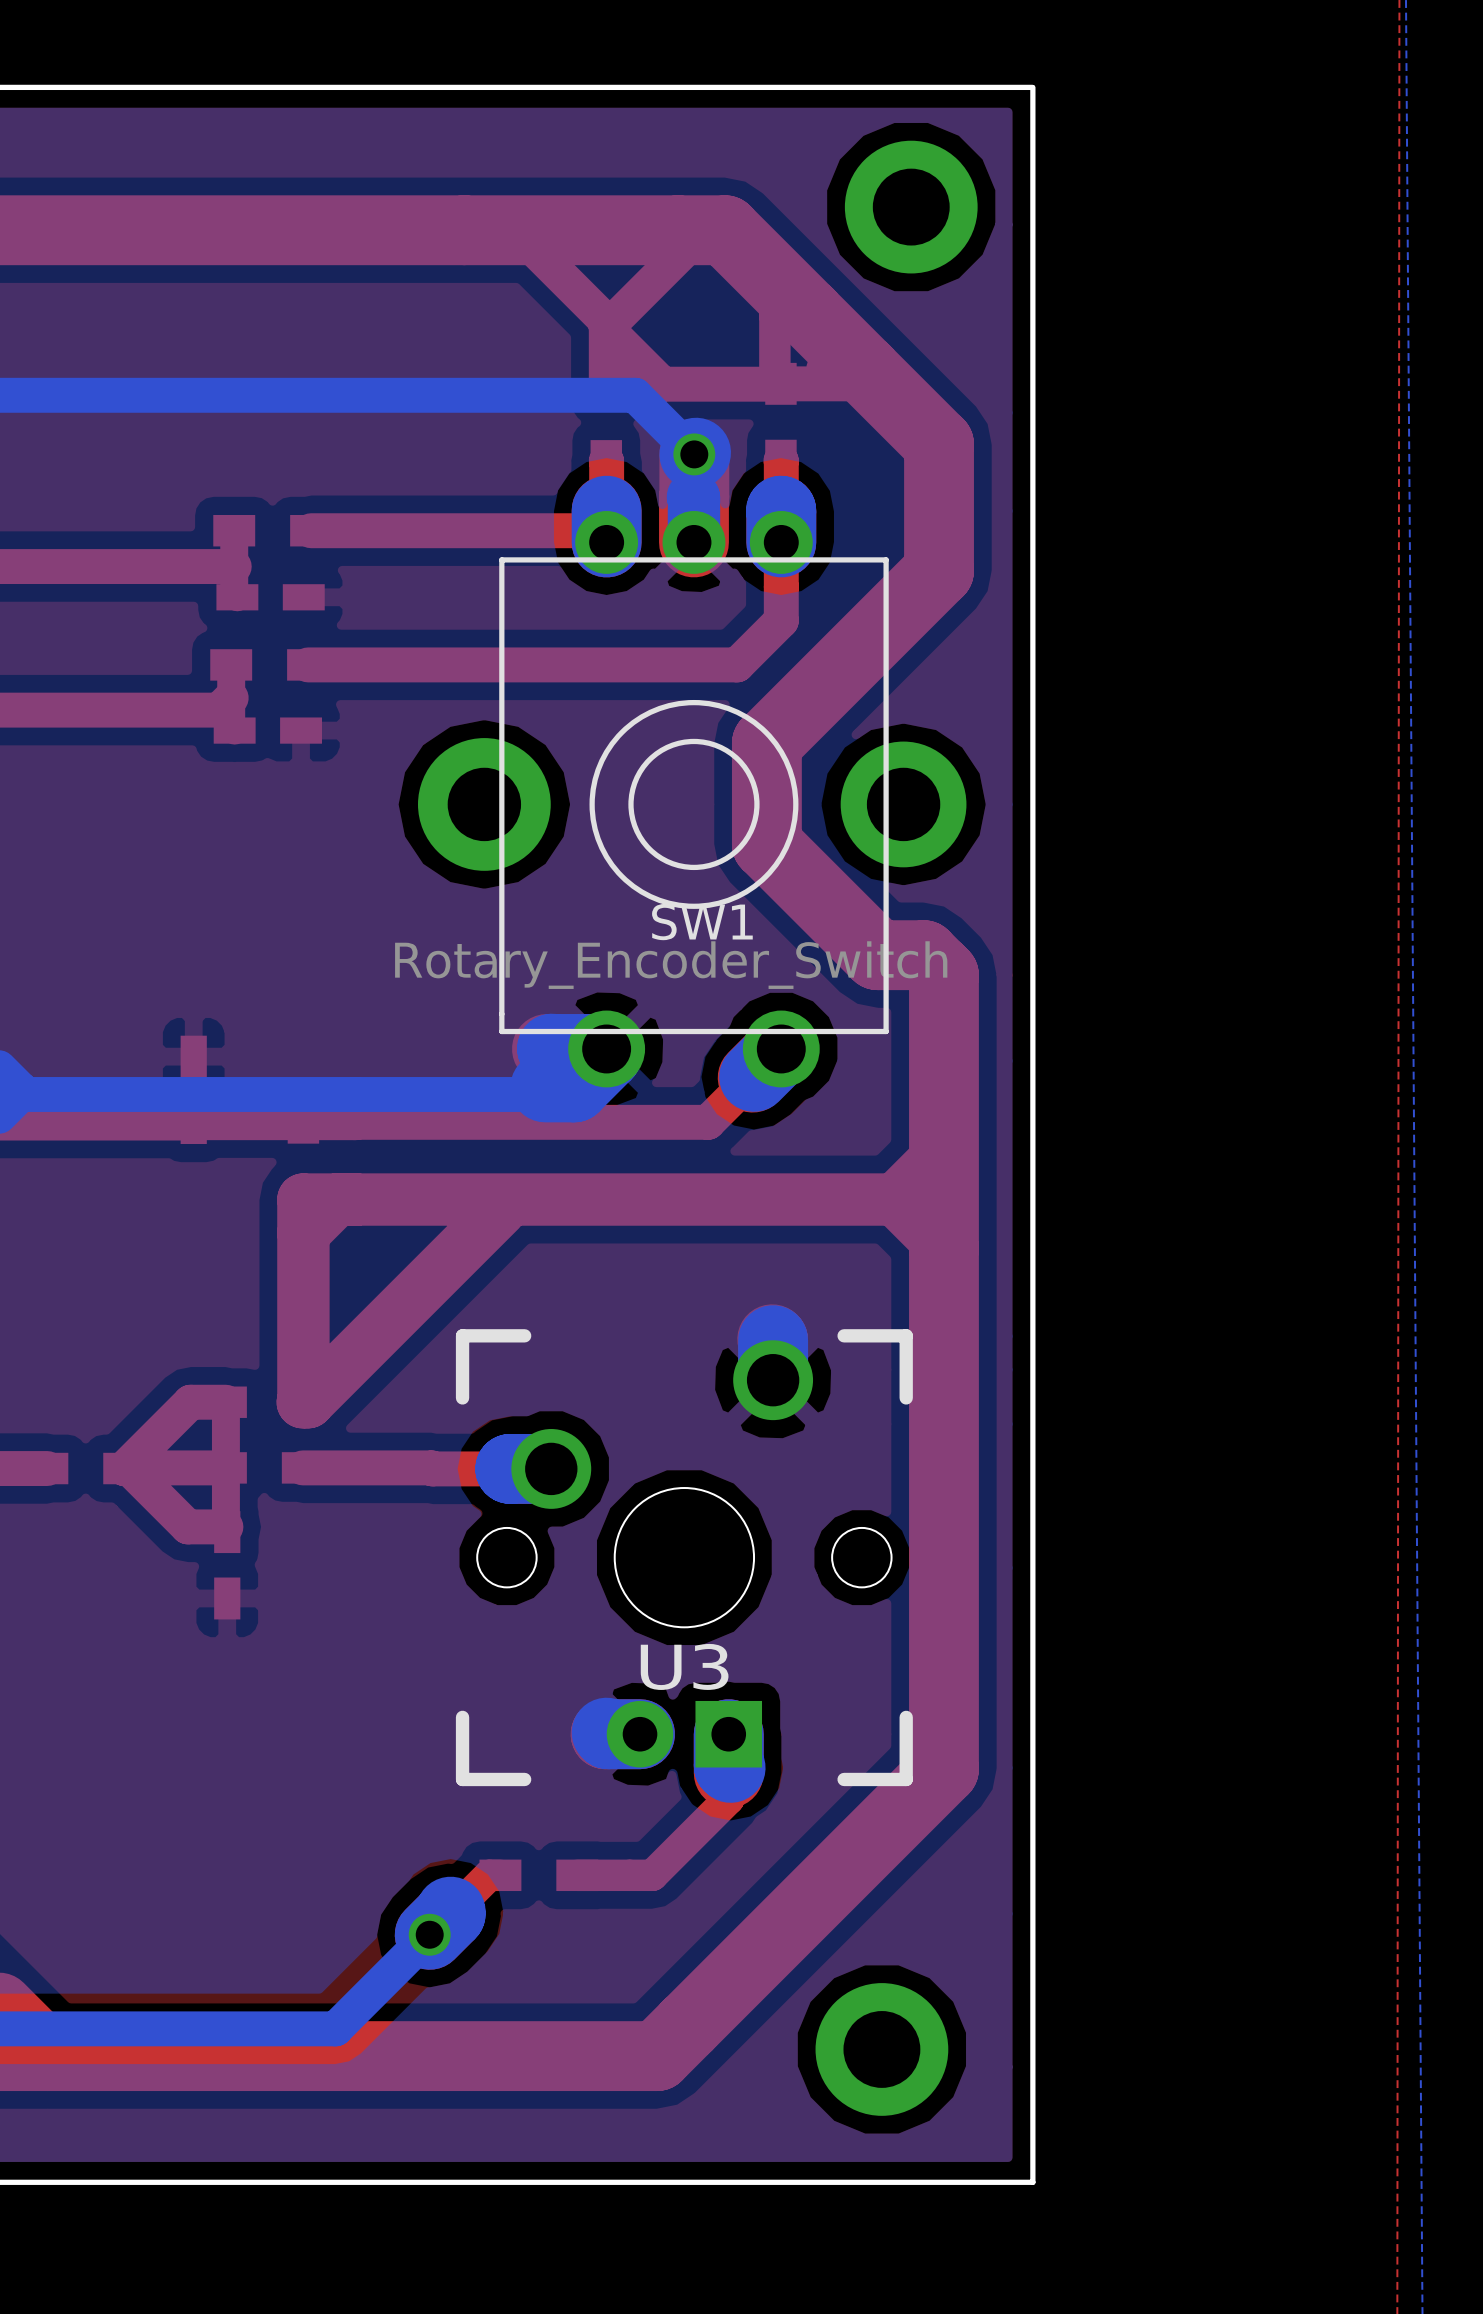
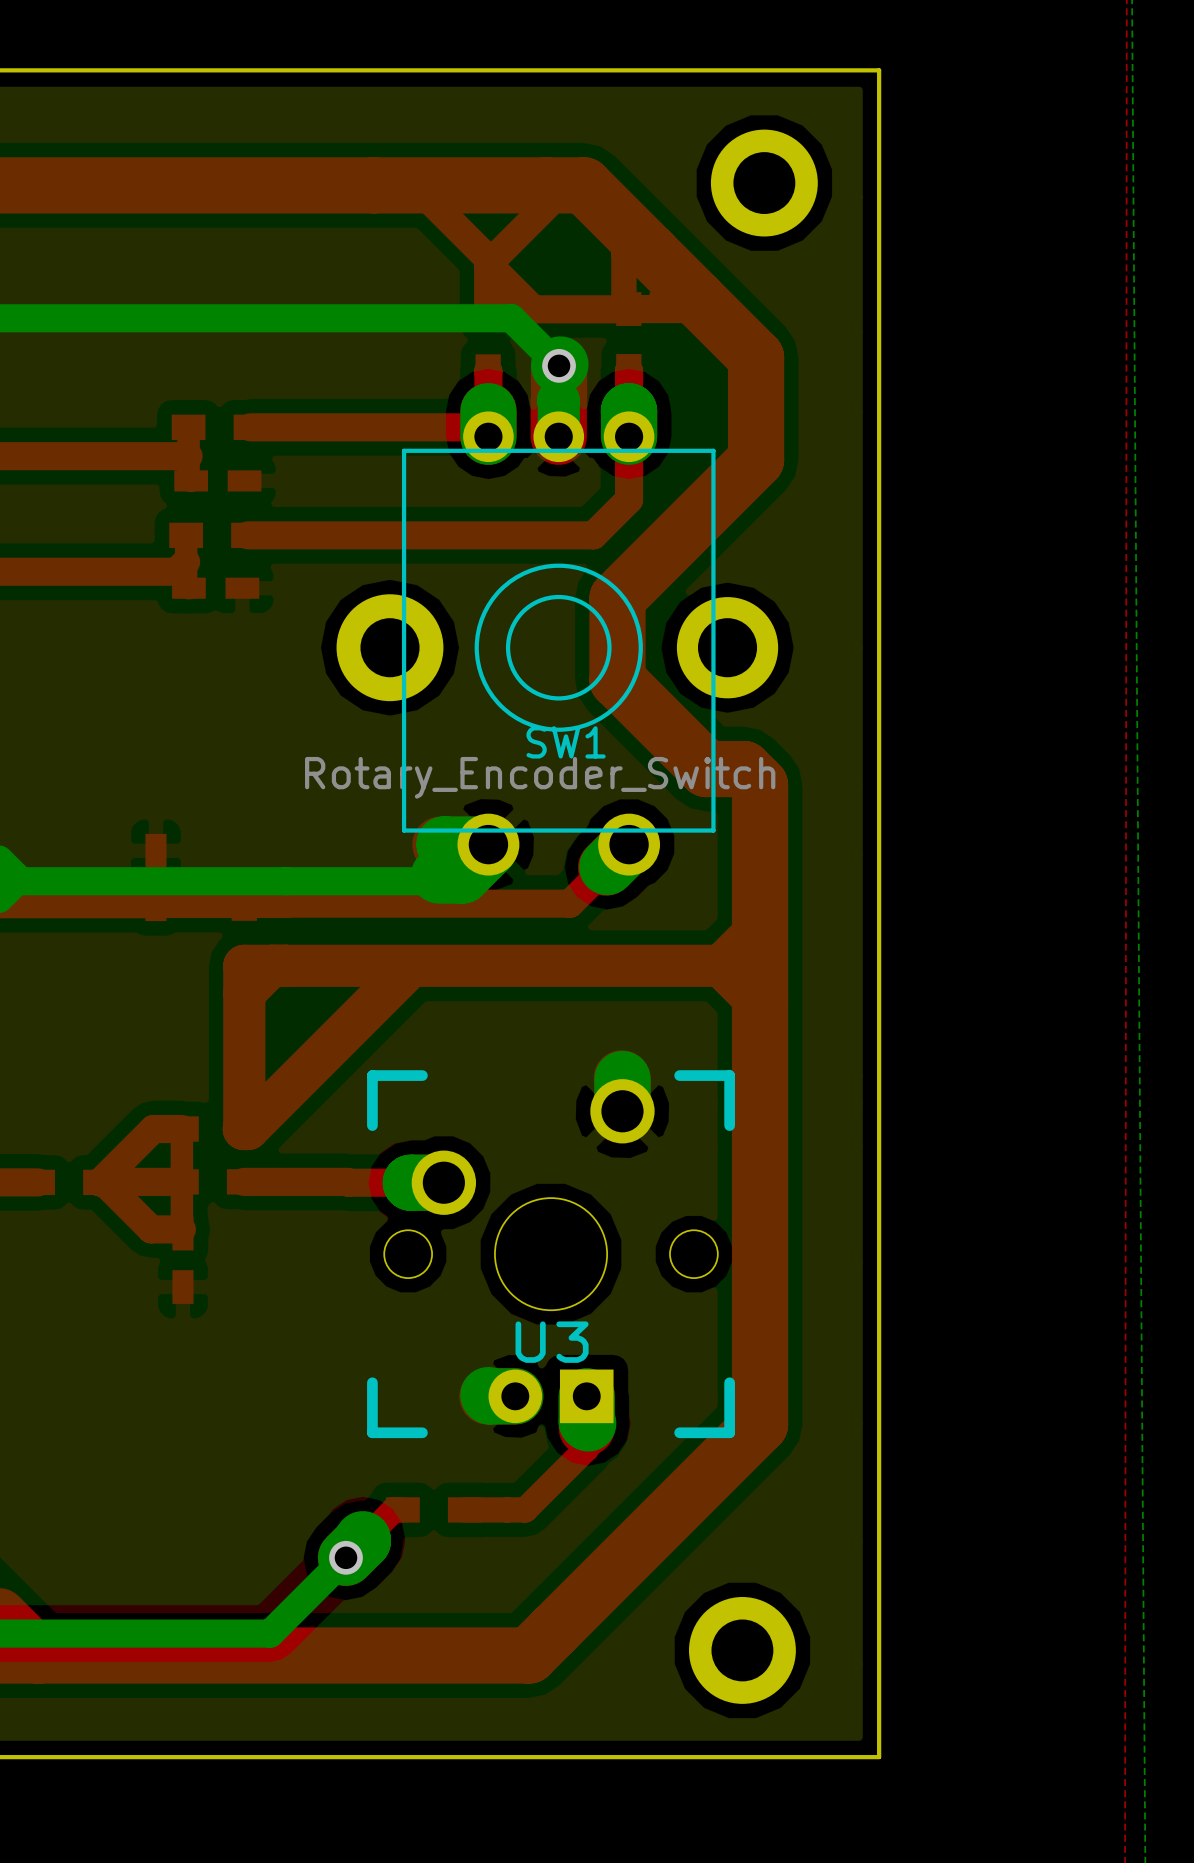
board edge: (1032, 87) (1032, 2182) -> (831, 70) (879, 70) (879, 1757) (831, 1757)
part position: (911, 207) -> (764, 183)
part position: (881, 2049) -> (742, 1650)

